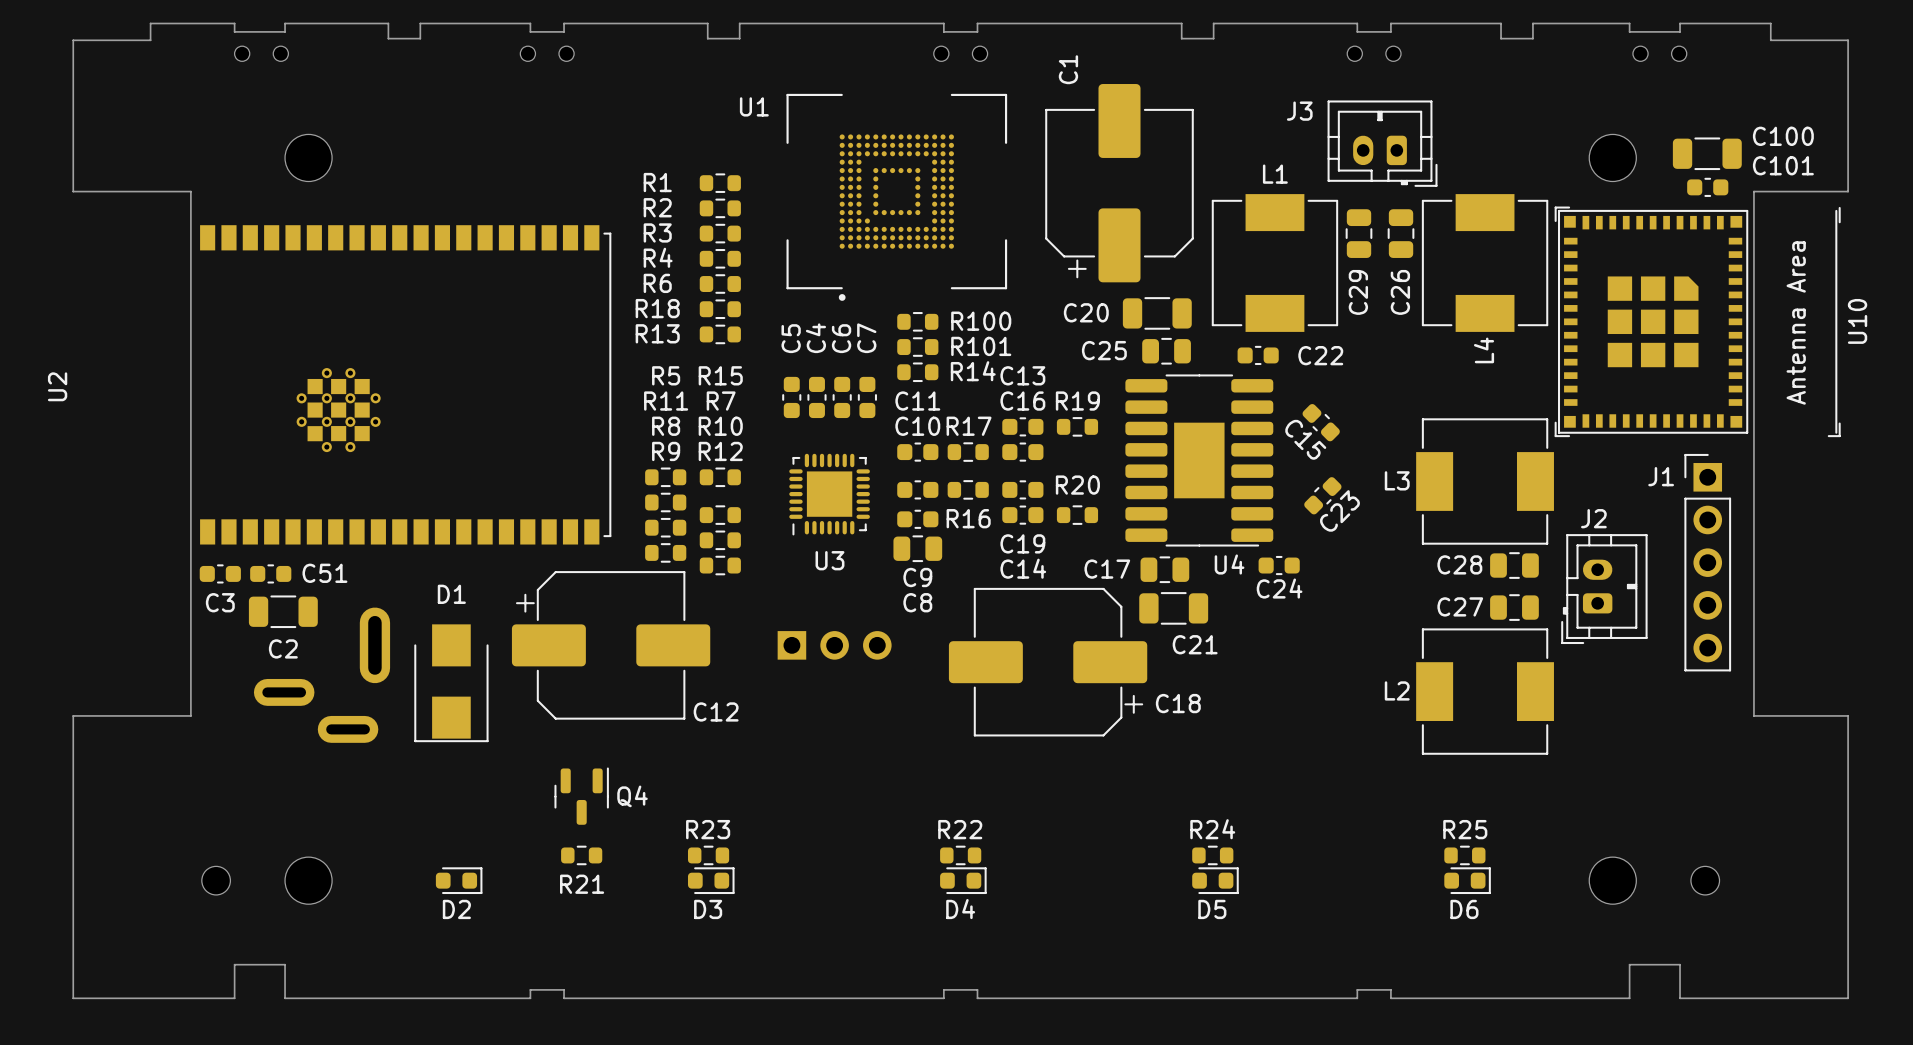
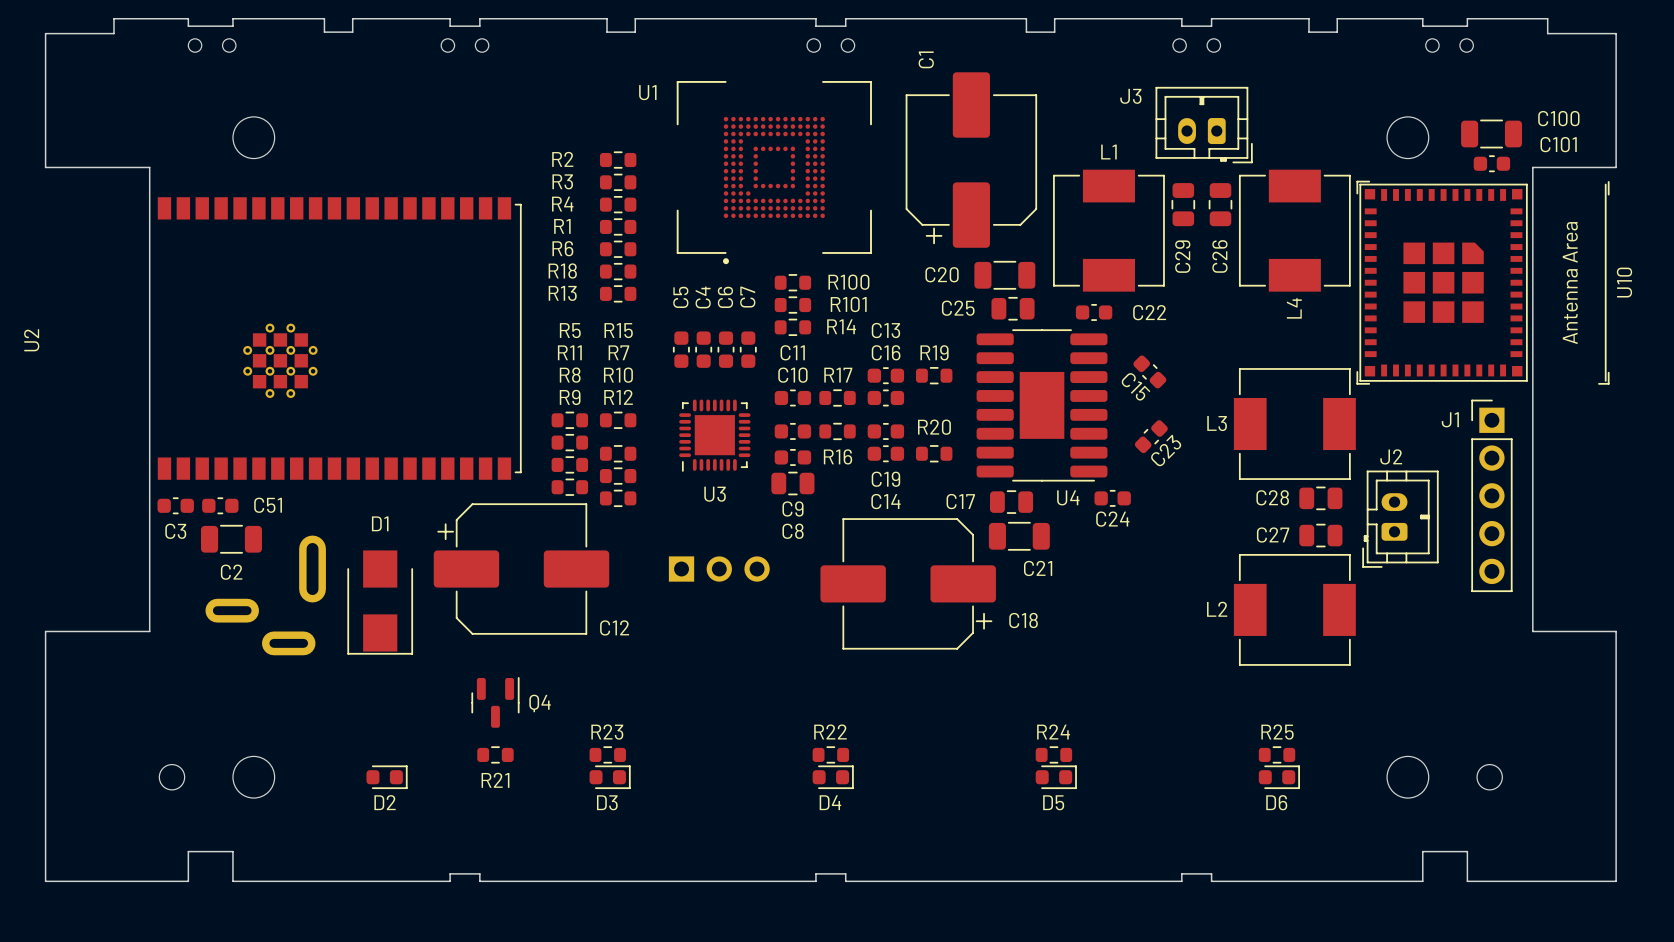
R1 name: R1 (657, 182) -> R2 (562, 159)
R2 name: R2 (657, 207) -> R3 (562, 181)
R3 name: R3 (657, 232) -> R4 (562, 204)
R4 name: R4 (658, 257) -> R1 (562, 226)

